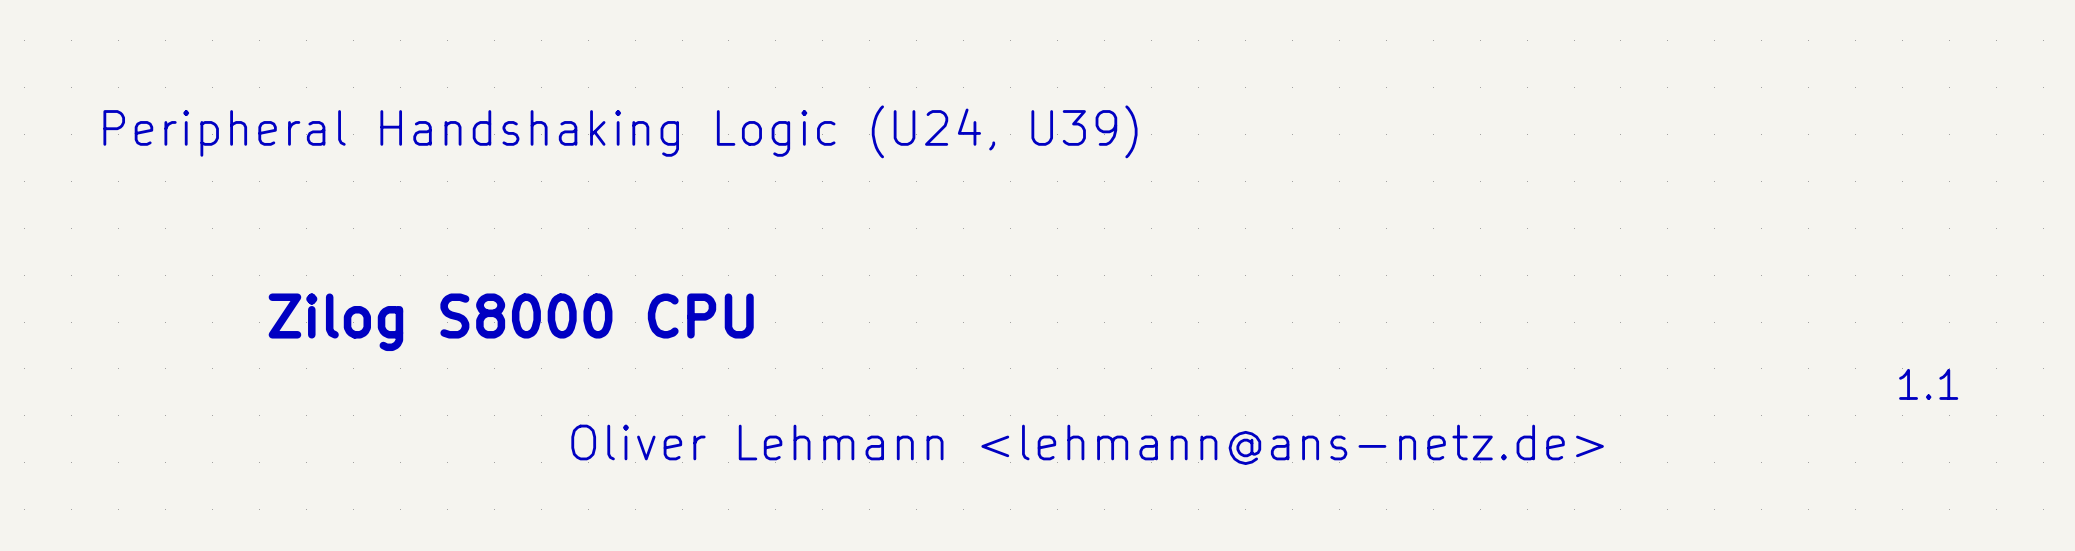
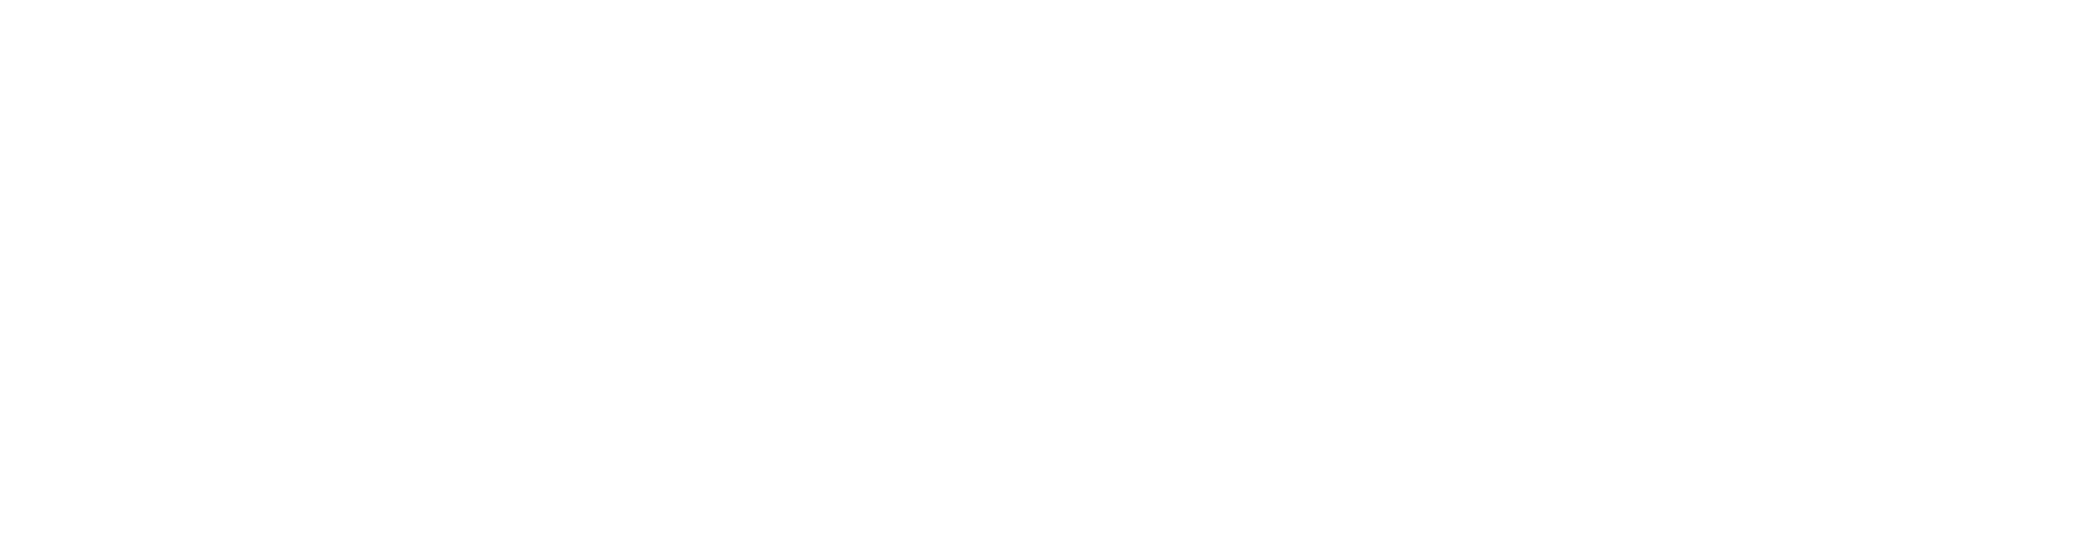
text: Peripheral Handshaking Logic (U24, U39) (620, 131) -> none
text: Zilog S8000 CPU (511, 322) -> none
text: 1.1 (1928, 384) -> none
text: Oliver Lehmann <lehmann@ans-netz.de> (1087, 444) -> none

